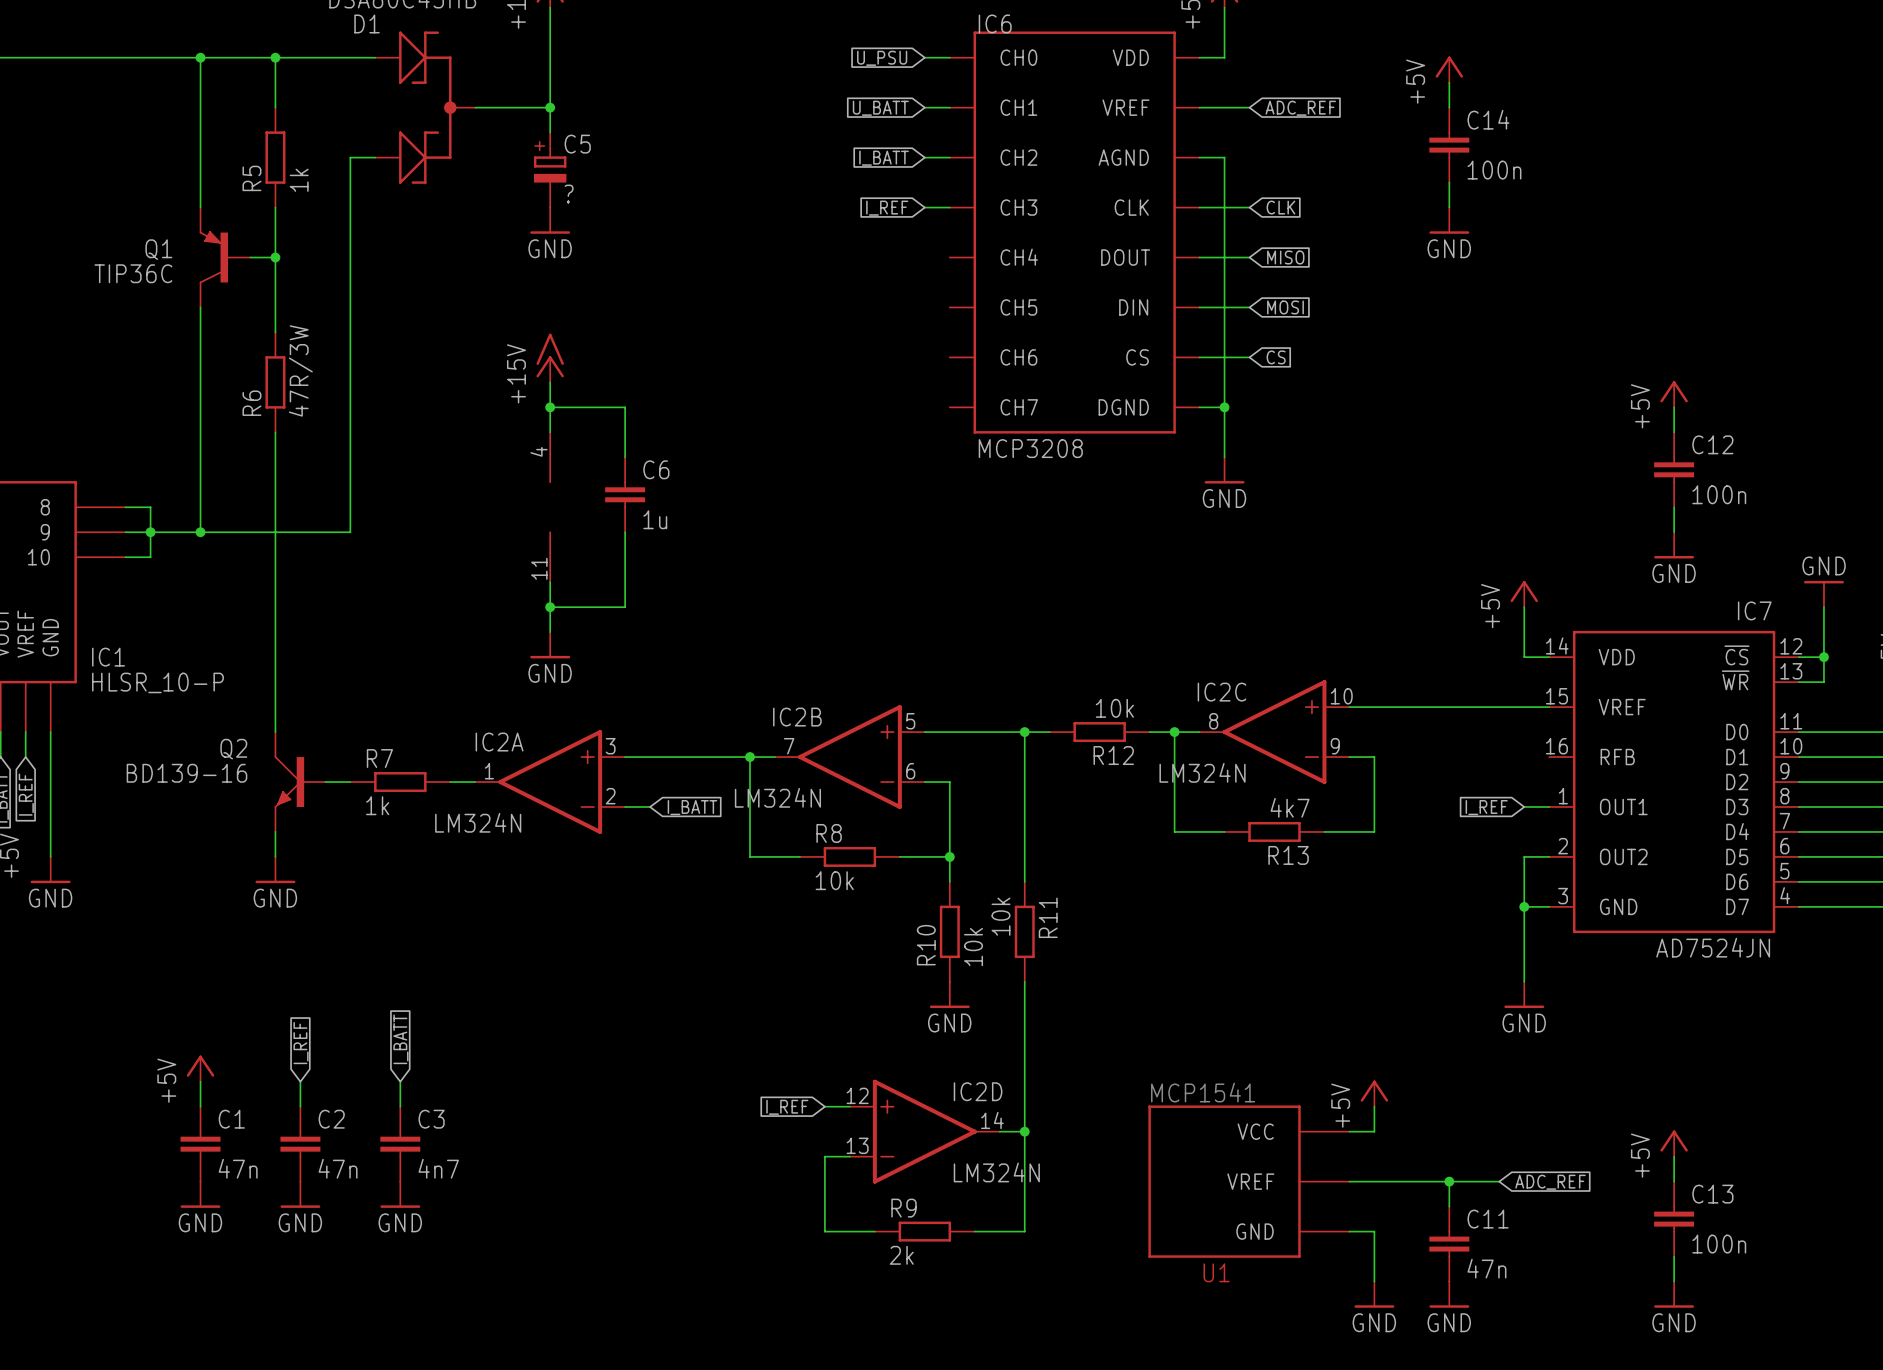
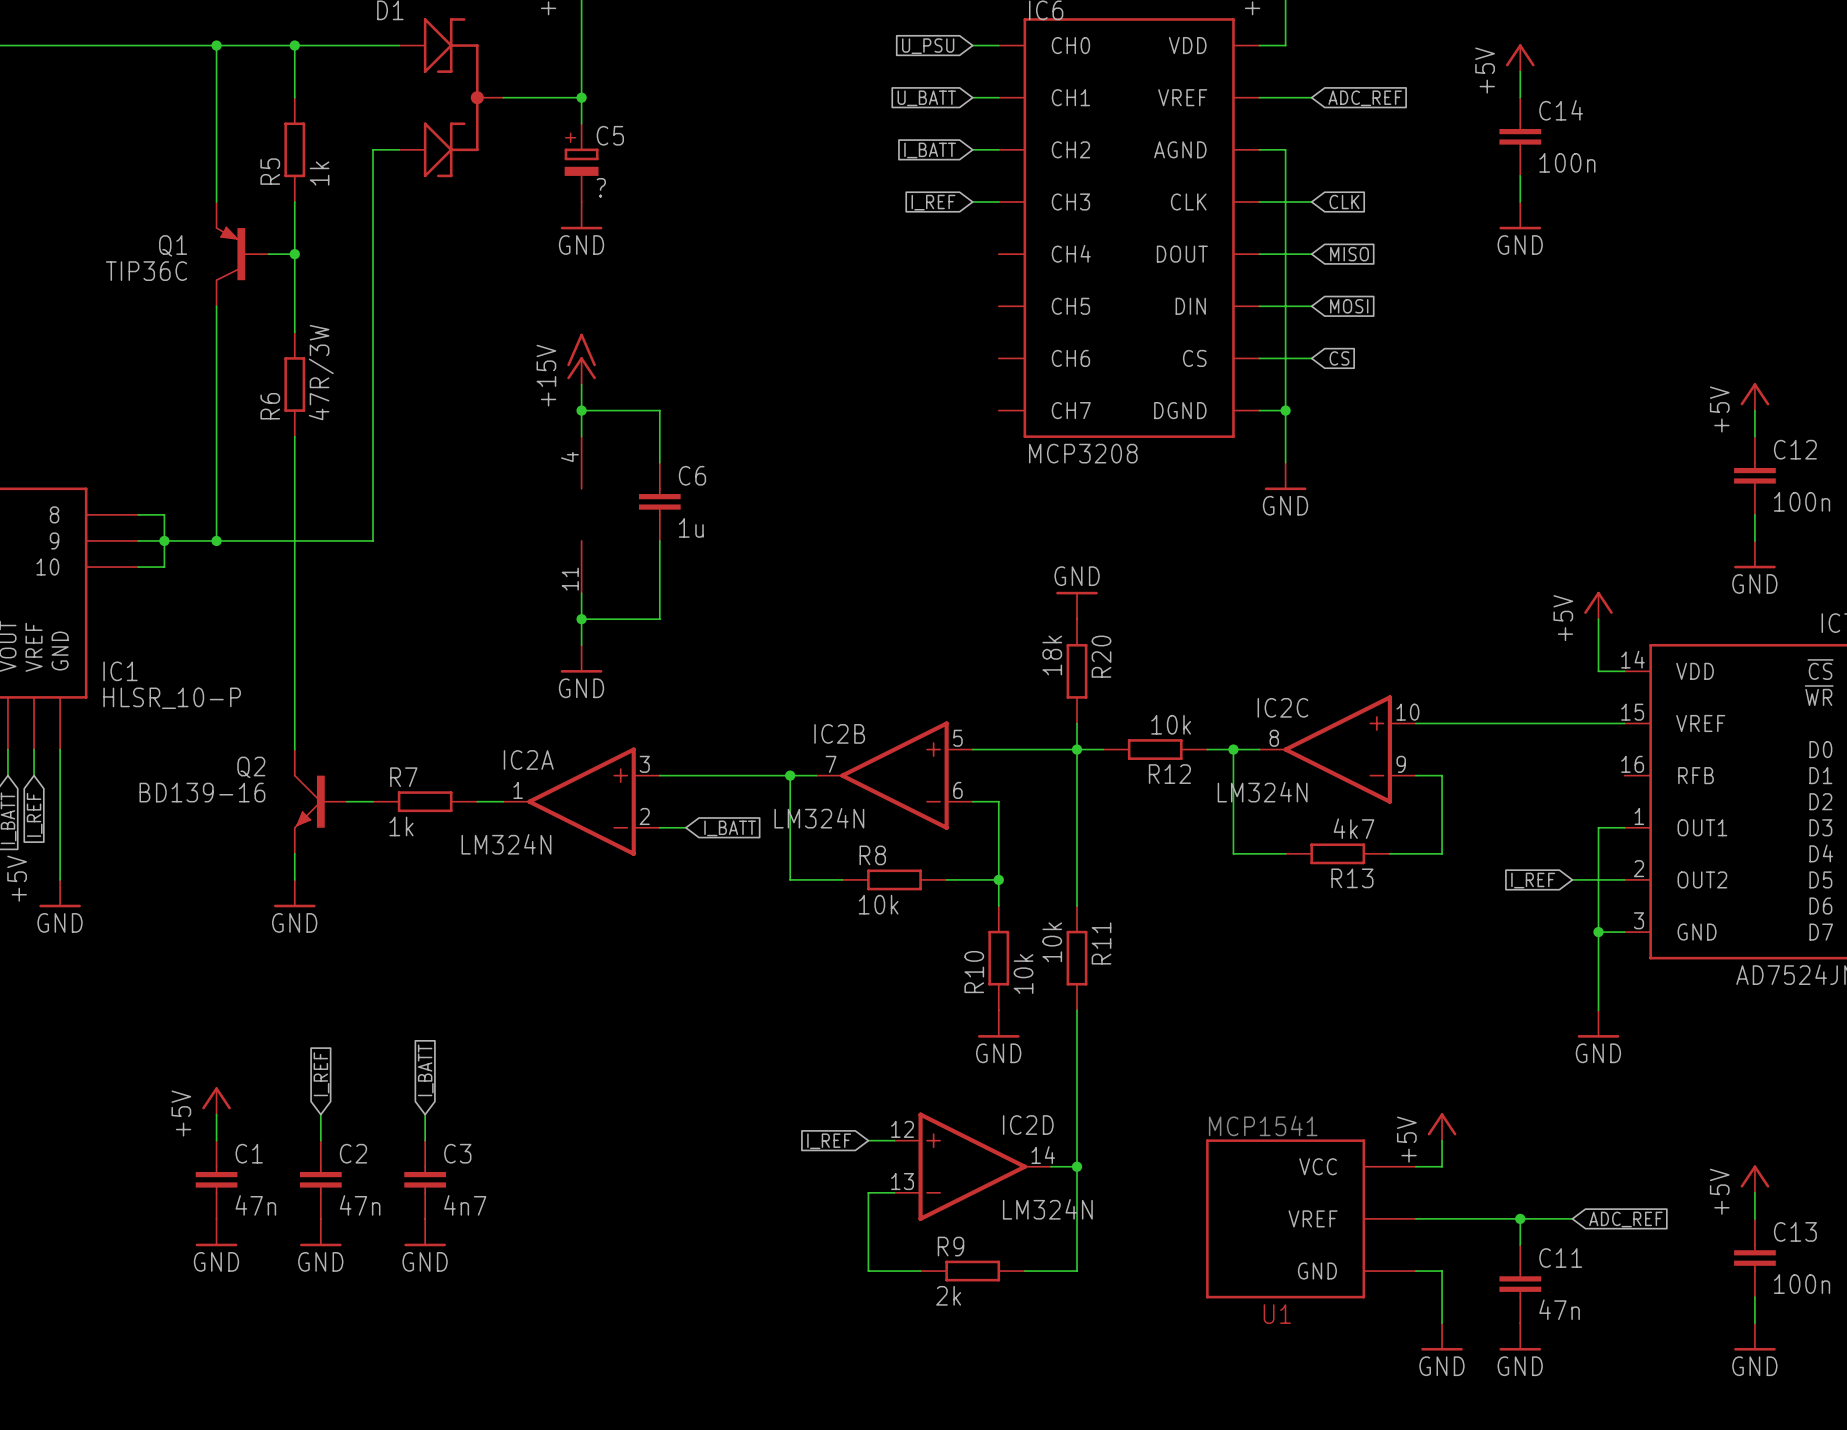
power symbol: none -> GND (1077, 605)
R20: none -> 18k (1077, 671)
wire: none -> (1077, 723) (1077, 749)
wire: none -> (1598, 827) (1598, 879) (1572, 879)
global label position: I_REF (1486, 807) -> I_REF (1533, 880)

